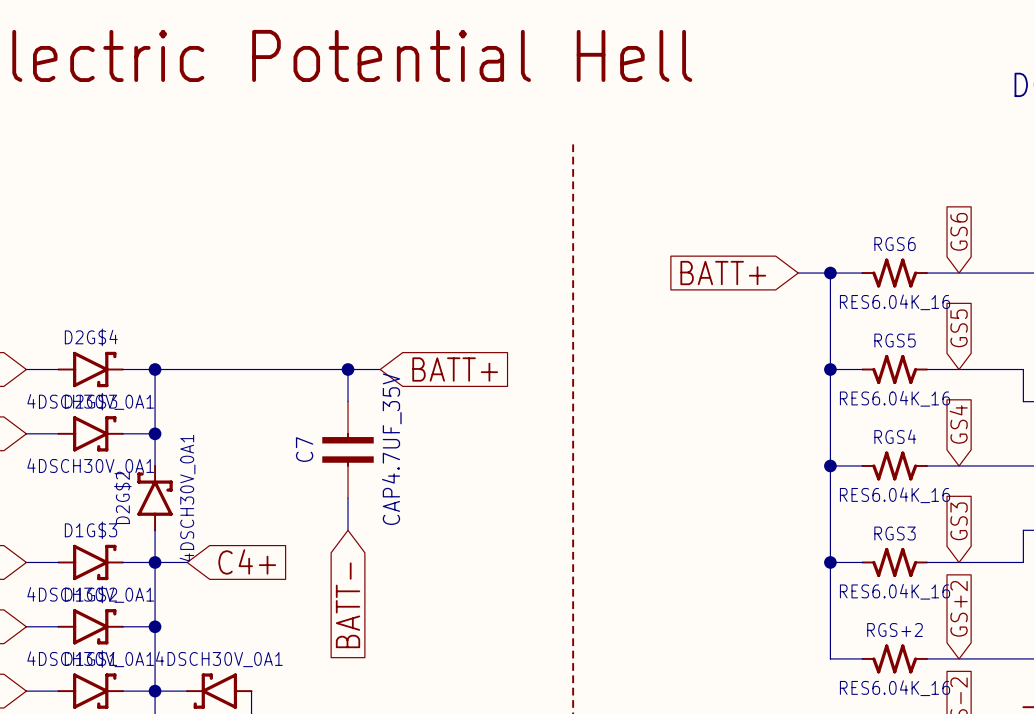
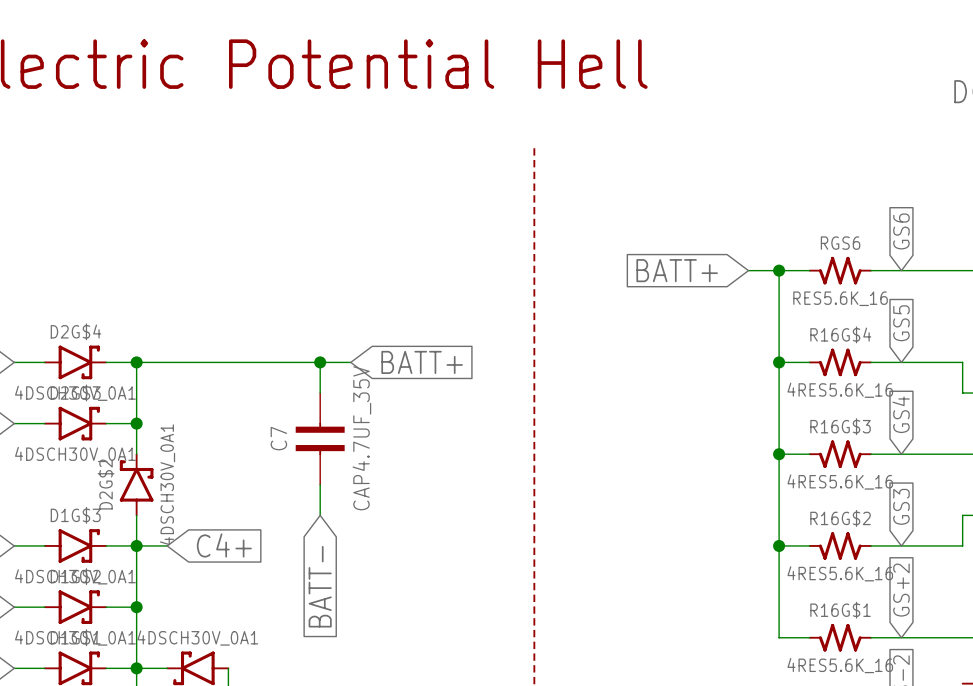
RGS6 value: RES6.04K_16 (895, 302) -> RES5.6K_16 (840, 298)
RGS5 name: RGS5 (895, 340) -> R16G$4 (840, 334)
RGS5 value: RES6.04K_16 (895, 398) -> 4RES5.6K_16 (840, 390)
RGS4 name: RGS4 (895, 436) -> R16G$3 (840, 426)
RGS4 value: RES6.04K_16 (895, 495) -> 4RES5.6K_16 (840, 482)
RGS3 name: RGS3 (895, 533) -> R16G$2 (840, 518)
RGS3 value: RES6.04K_16 (895, 591) -> 4RES5.6K_16 (840, 573)
RGS+2 name: RGS+2 (895, 630) -> R16G$1 (840, 610)
RGS+2 value: RES6.04K_16 (895, 688) -> 4RES5.6K_16 (840, 665)

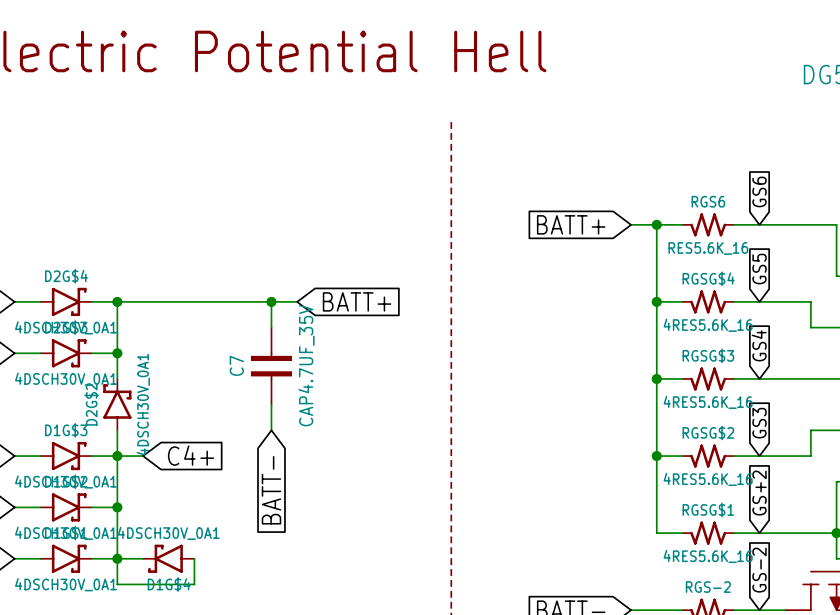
R16G$4 name: R16G$4 (840, 334) -> RGSG$4 (708, 278)
R16G$3 name: R16G$3 (840, 426) -> RGSG$3 (708, 355)
R16G$2 name: R16G$2 (840, 518) -> RGSG$2 (708, 432)
R16G$1 name: R16G$1 (840, 610) -> RGSG$1 (708, 509)

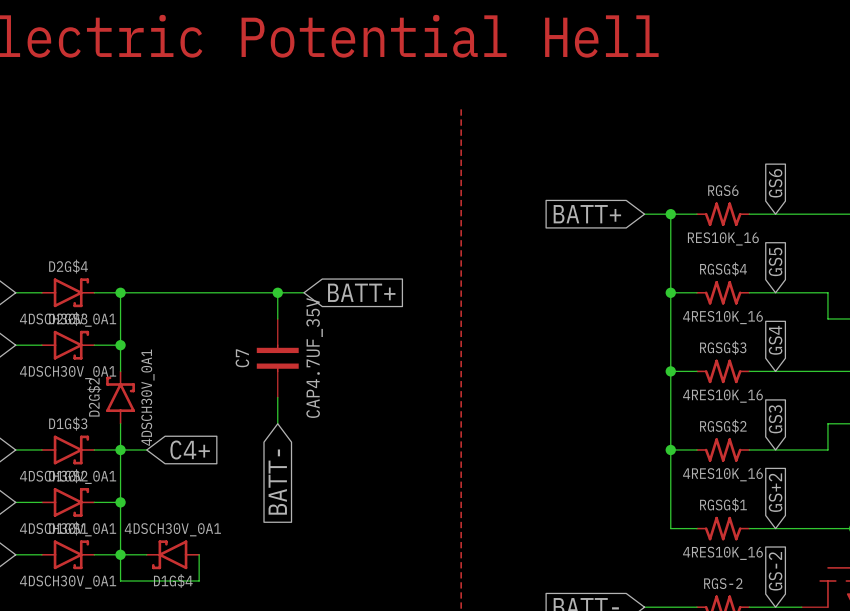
RGS6 value: RES5.6K_16 (708, 248) -> RES10K_16 (723, 238)
RGSG$4 value: 4RES5.6K_16 (708, 325) -> 4RES10K_16 (722, 317)
RGSG$3 value: 4RES5.6K_16 (708, 402) -> 4RES10K_16 (722, 396)
RGSG$2 value: 4RES5.6K_16 (708, 479) -> 4RES10K_16 (722, 474)
RGSG$1 value: 4RES5.6K_16 (708, 556) -> 4RES10K_16 (722, 553)

